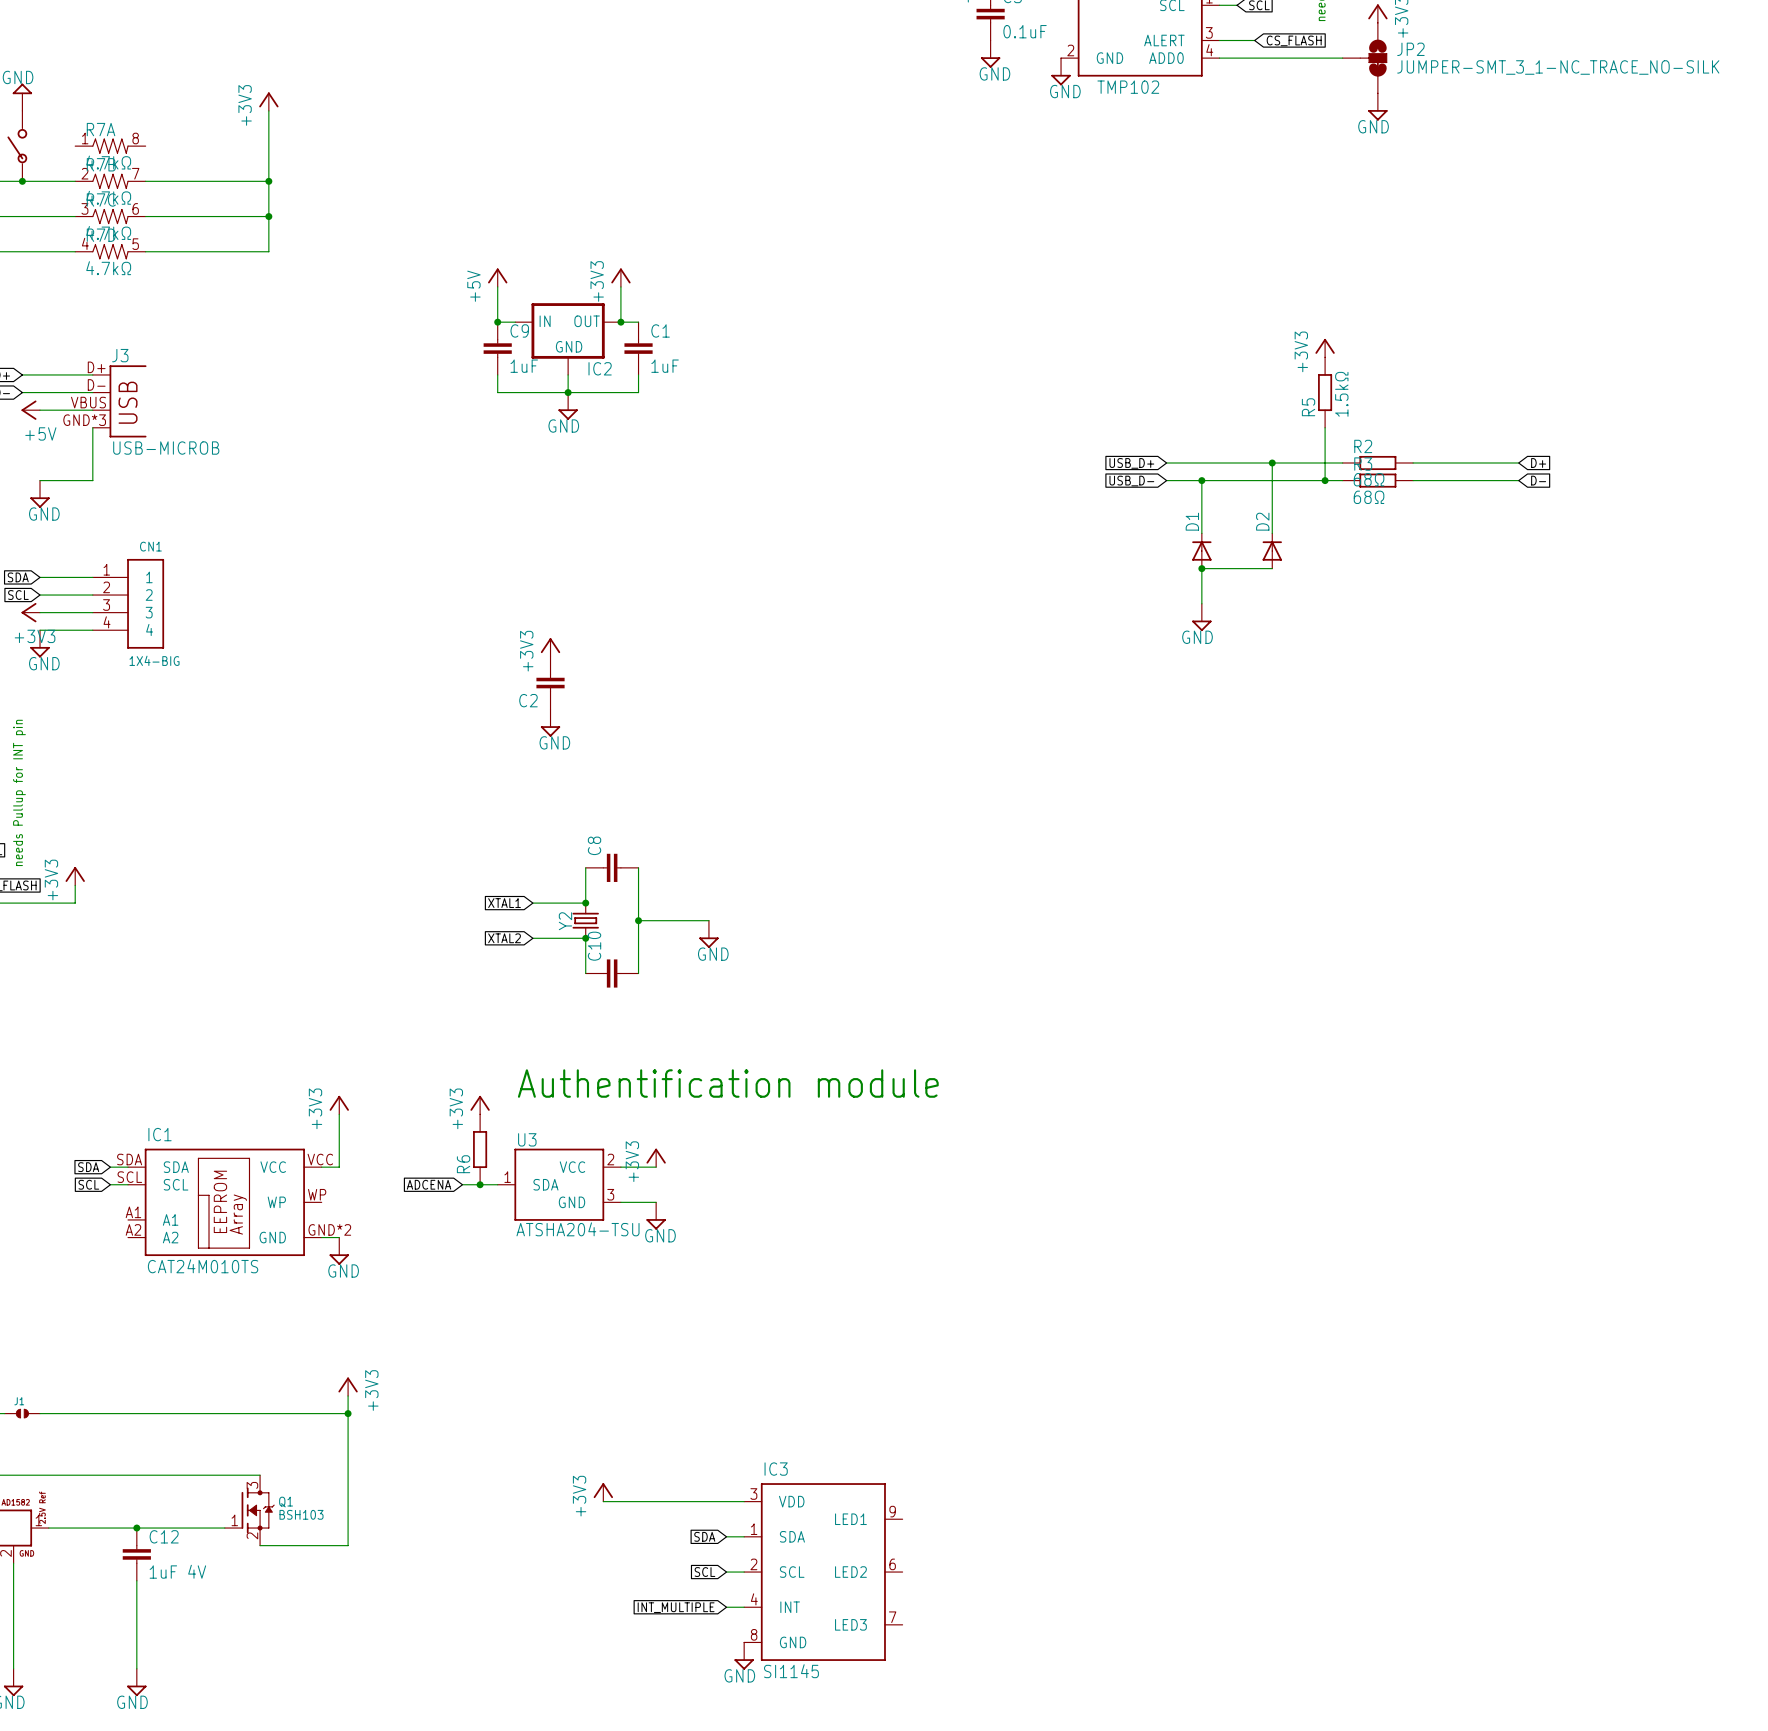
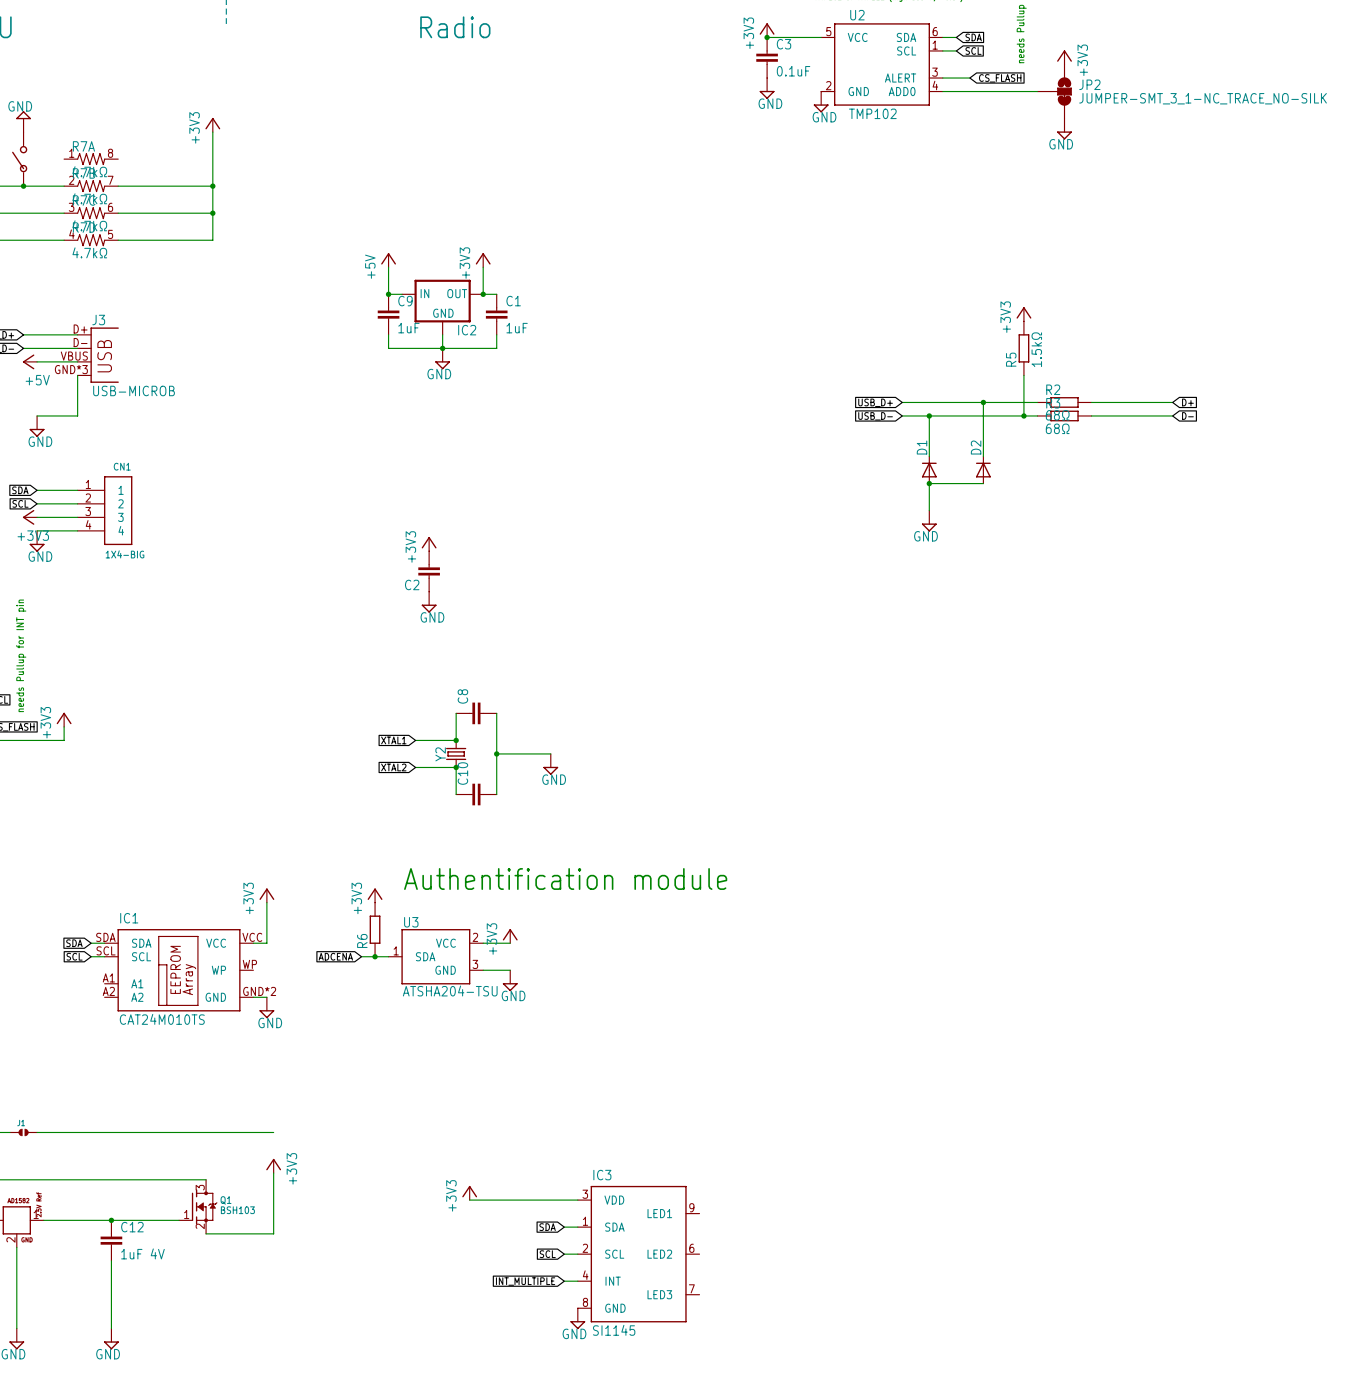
power symbol position: +3V3 (348, 1386) -> +3V3 (273, 1165)
wire: (348, 1395) (348, 1466) -> none
junction: (348, 1413) -> none

